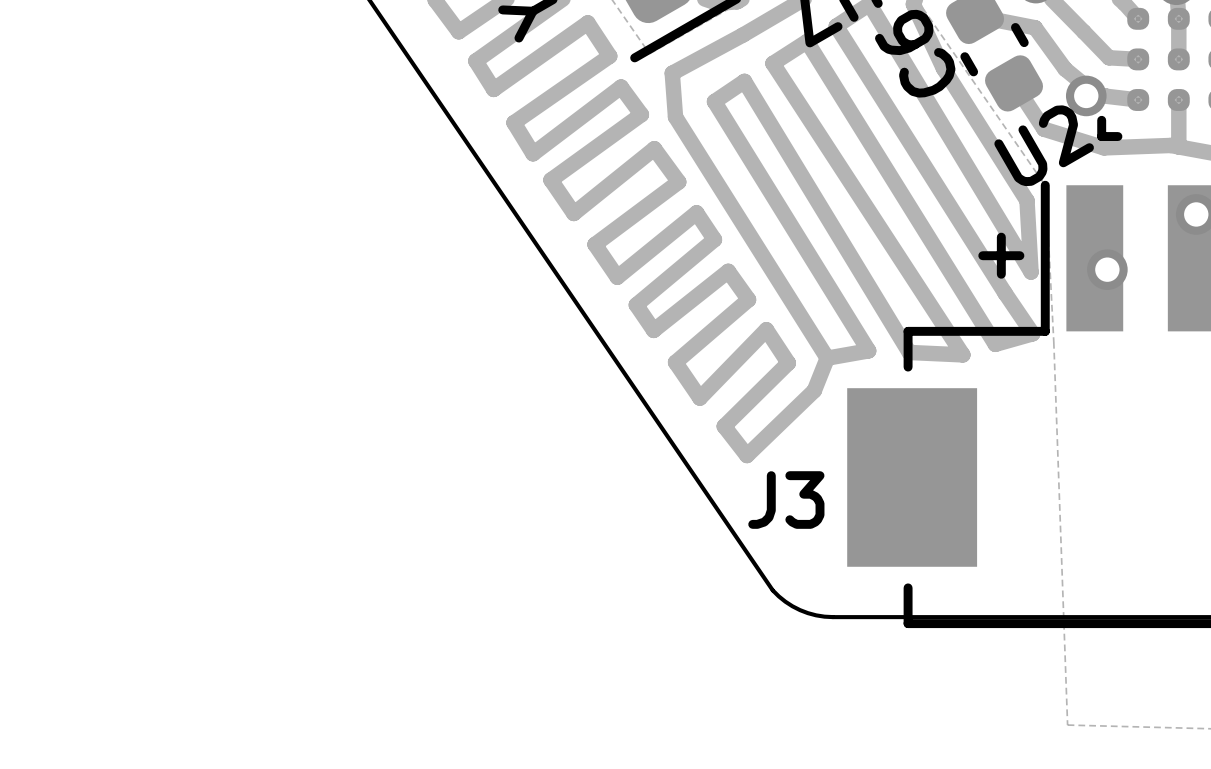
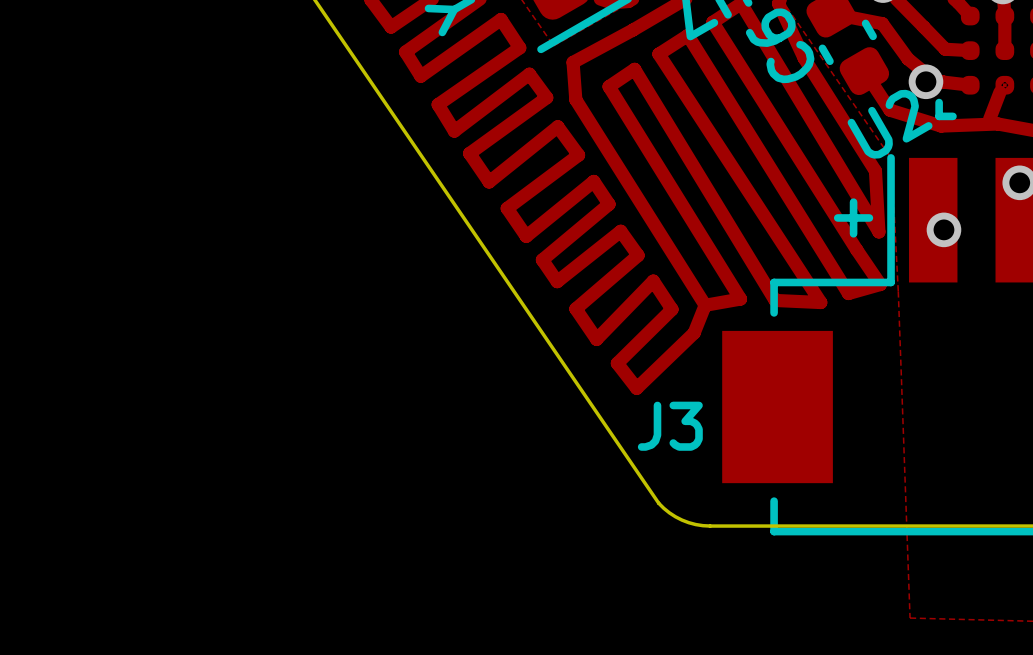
track: (1178, 100) (1178, 146) -> none
track: none -> (1000, 92) (989, 119)

